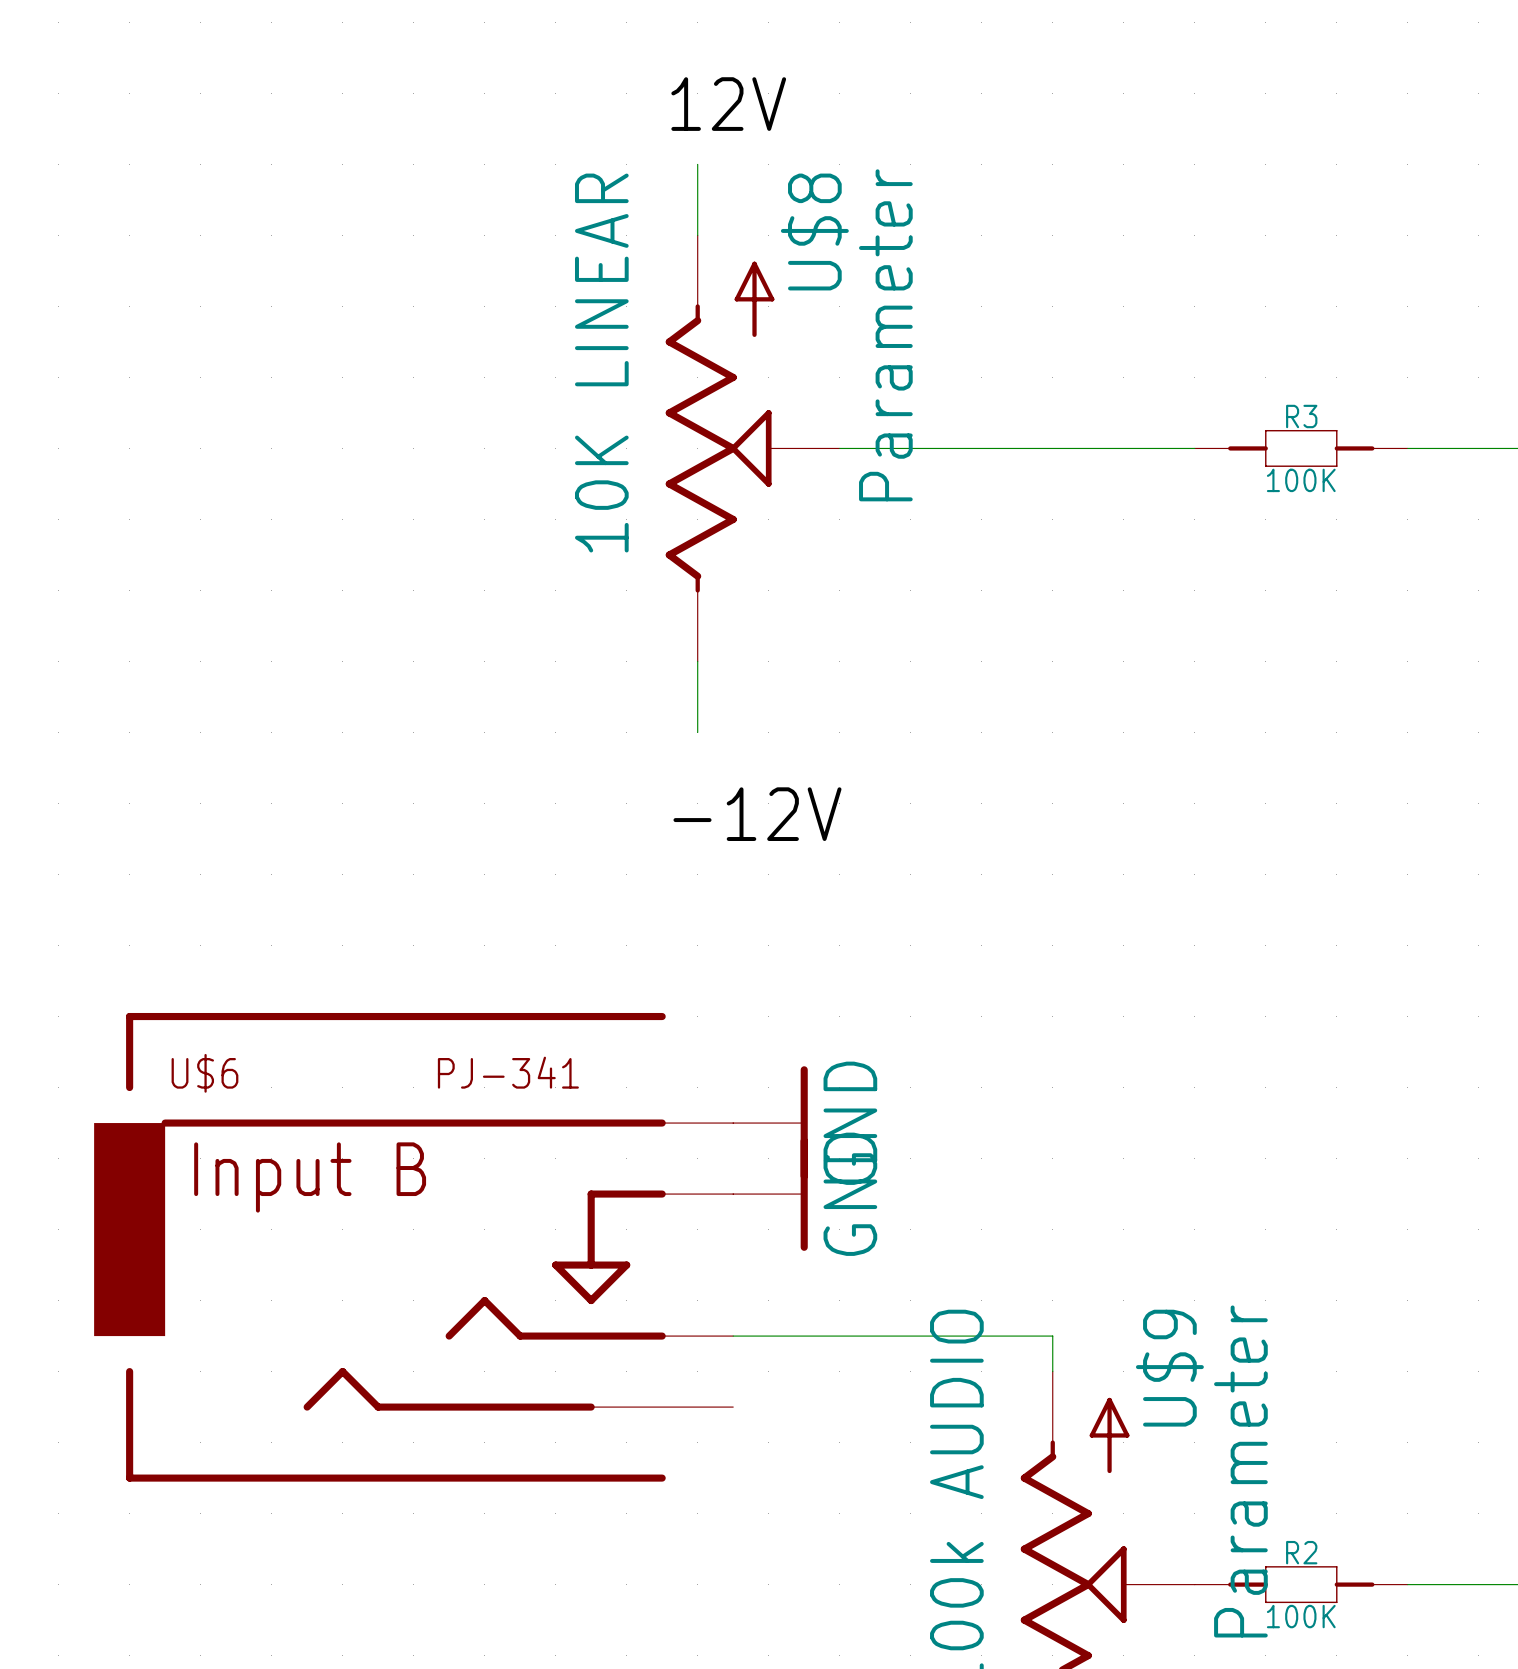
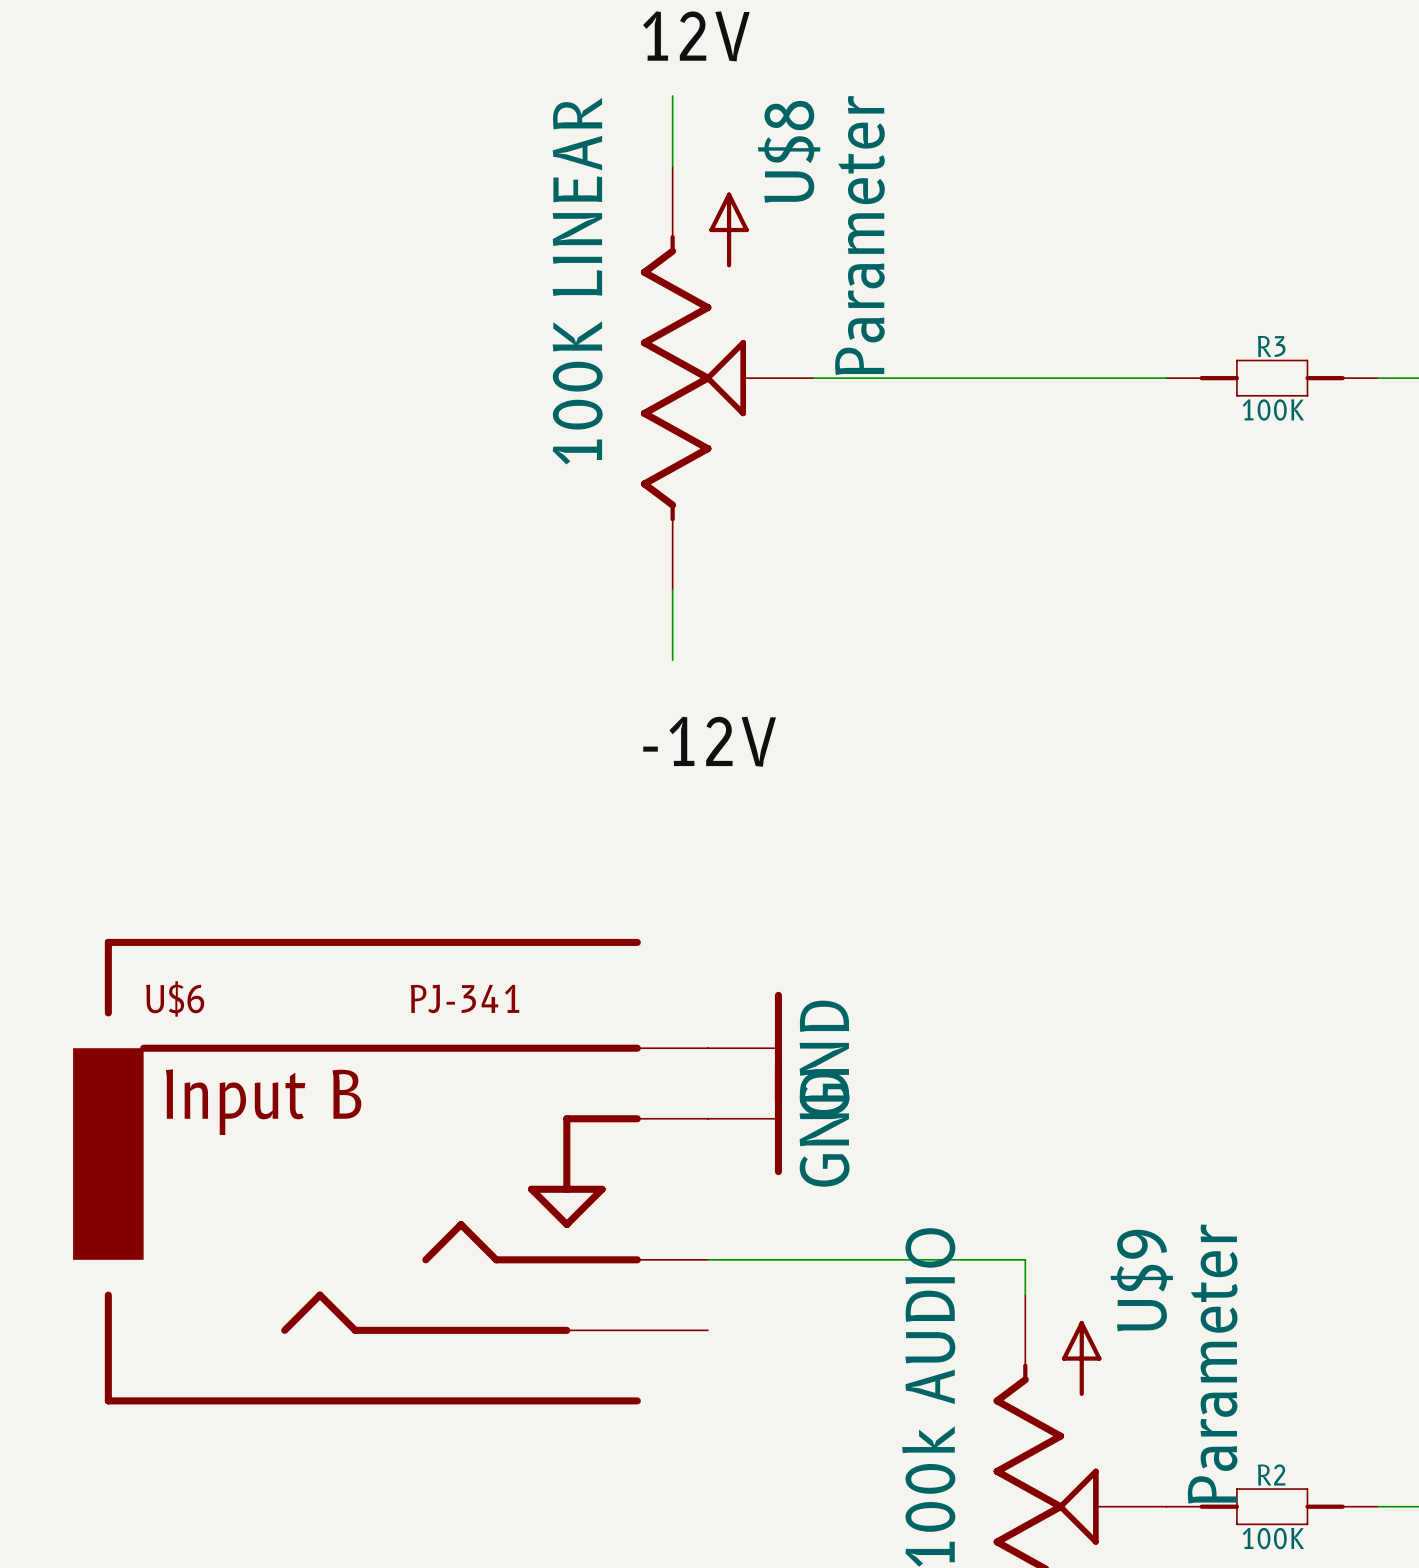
U$8 value: 10K LINEAR (601, 363) -> 100K LINEAR (577, 281)

